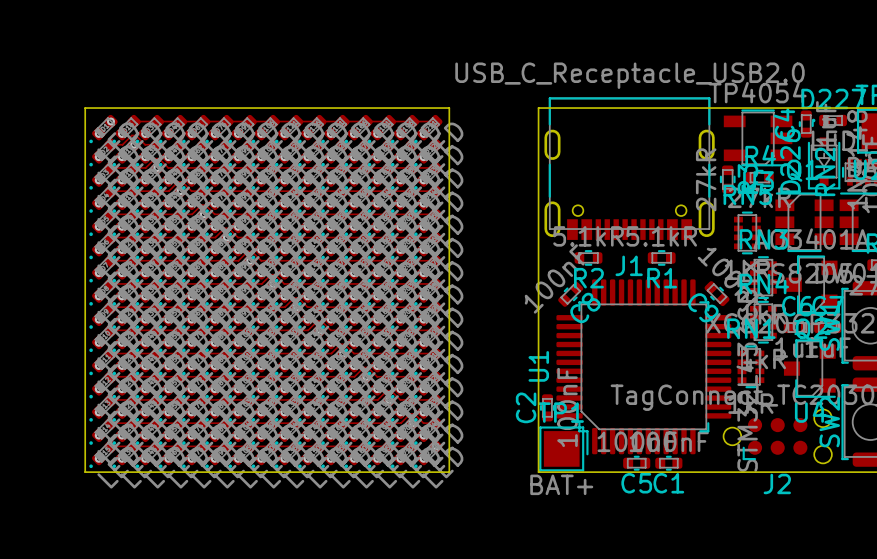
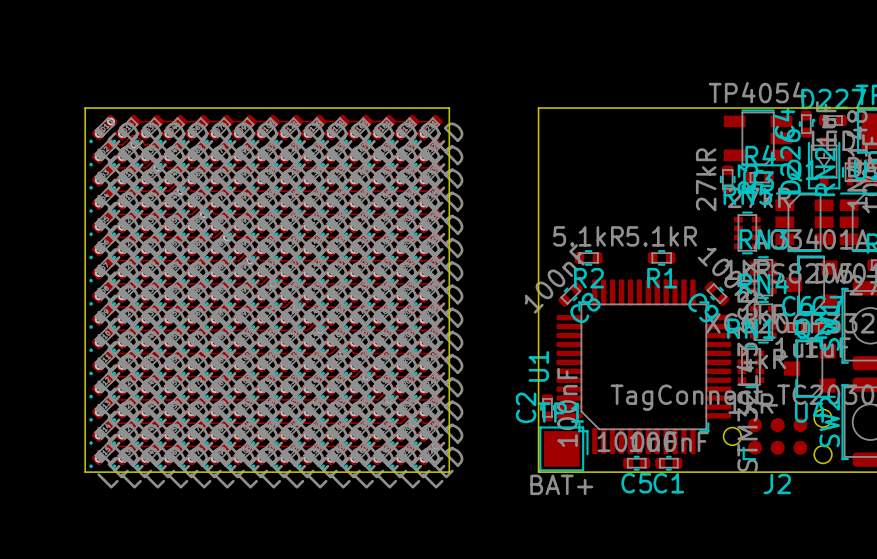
J1: USB_C_Receptacle_USB2.0 (629, 168) -> none

